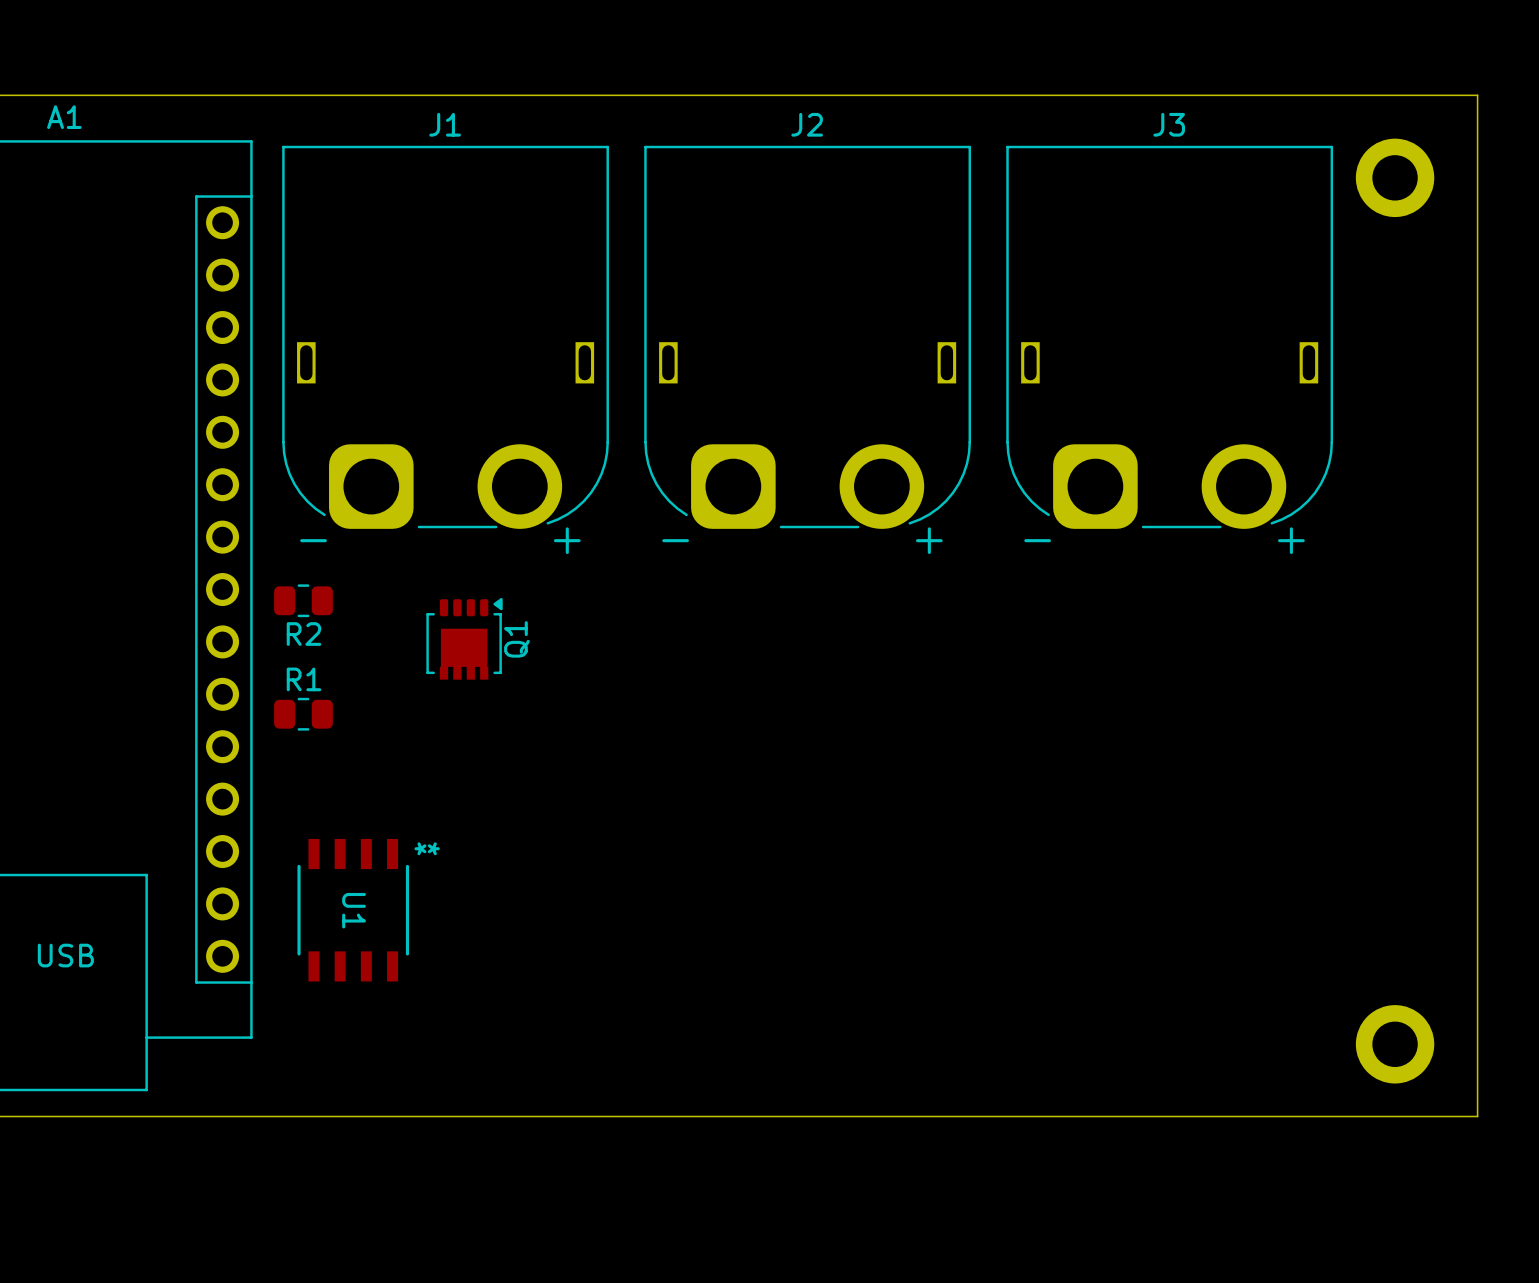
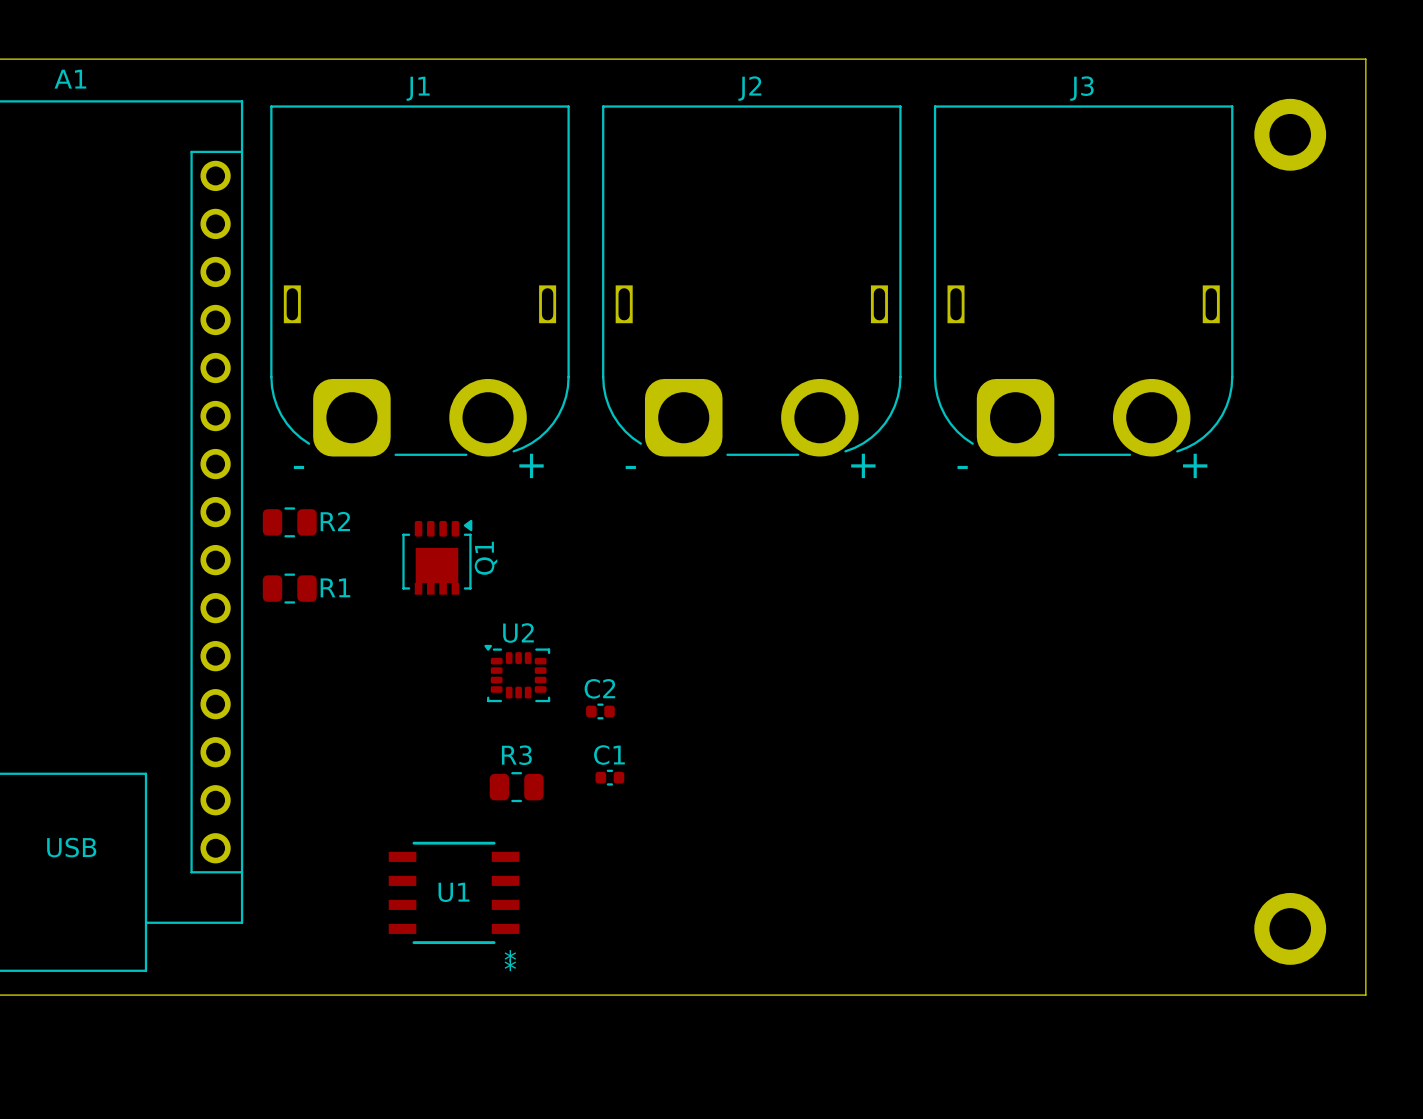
R2 name position: R2 (303, 634) -> R2 (335, 521)
R1 name position: R1 (303, 679) -> R1 (335, 587)
R1 position: (303, 714) -> (289, 588)
U2: none -> (517, 673)
C2: none -> (600, 711)
C1: none -> (609, 777)
R3: none -> (516, 787)
U1 rotation: 0° (353, 910) -> 90° clockwise (454, 892)
U1 position: (353, 910) -> (454, 892)

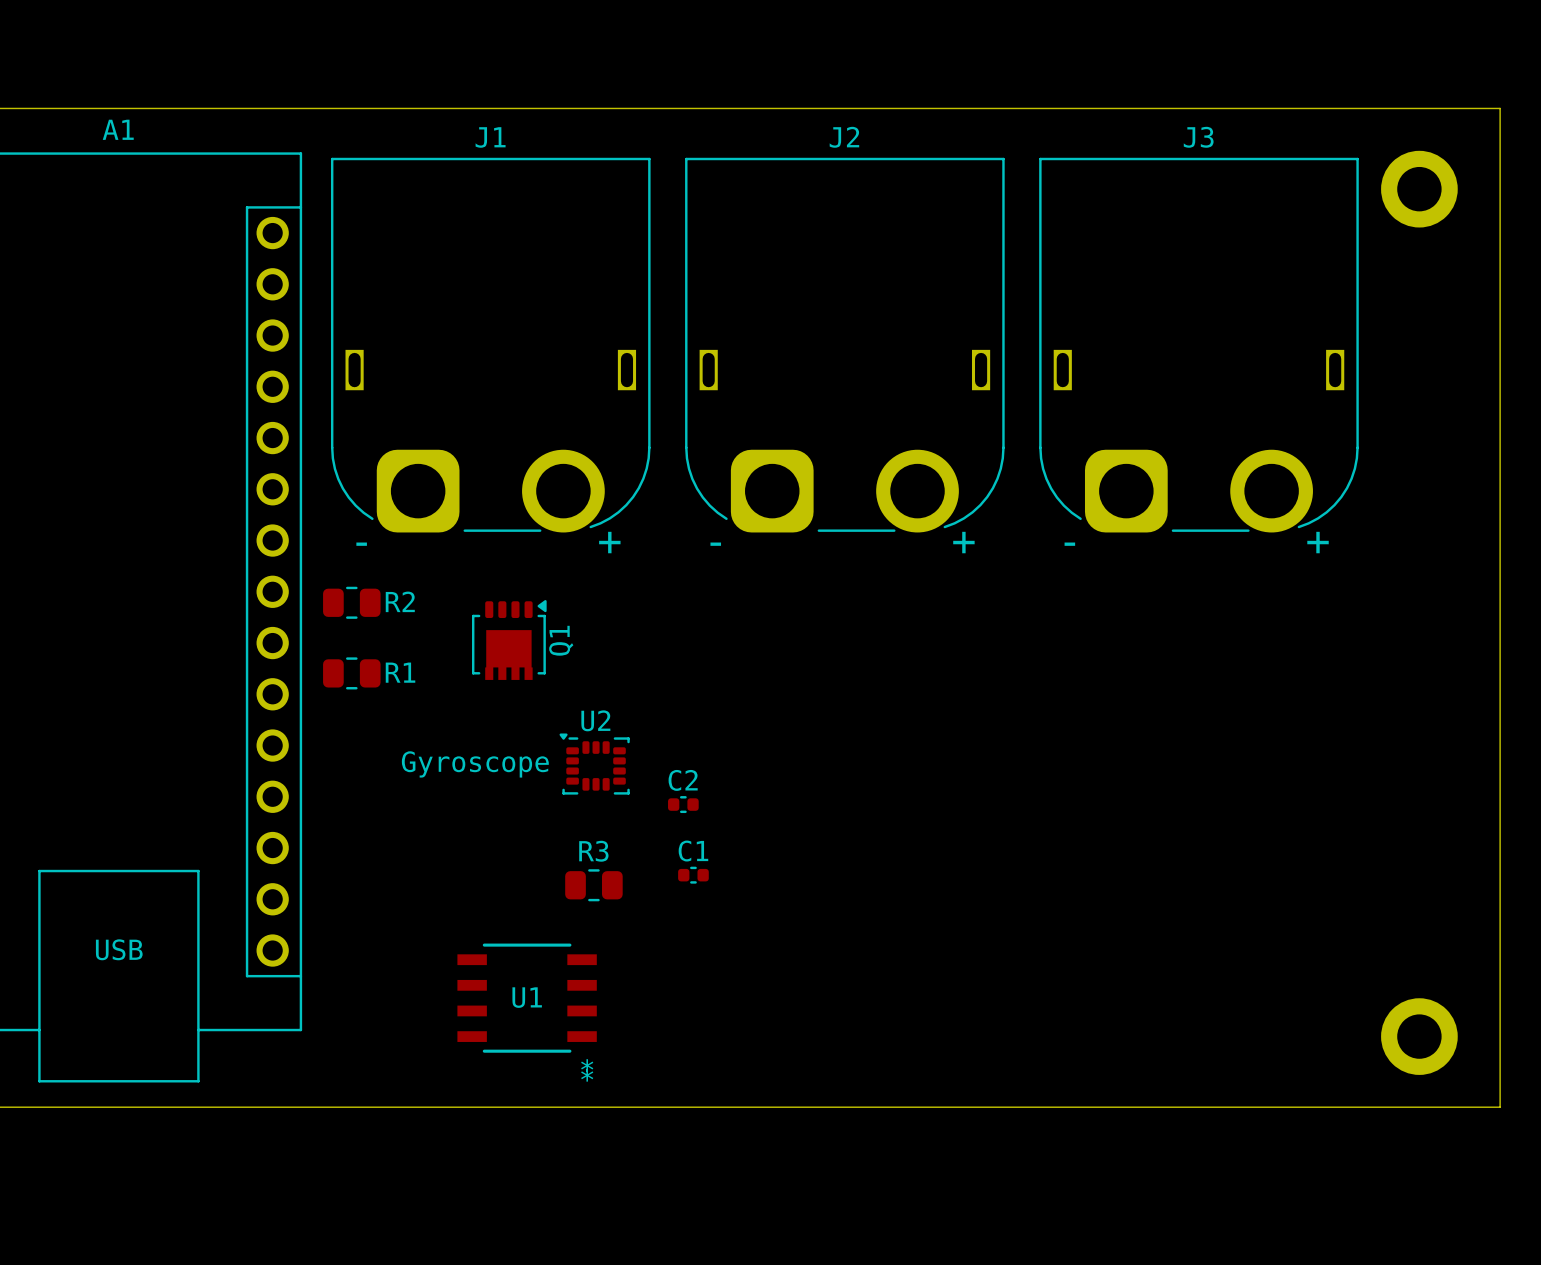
text: none -> Gyroscope (475, 764)

